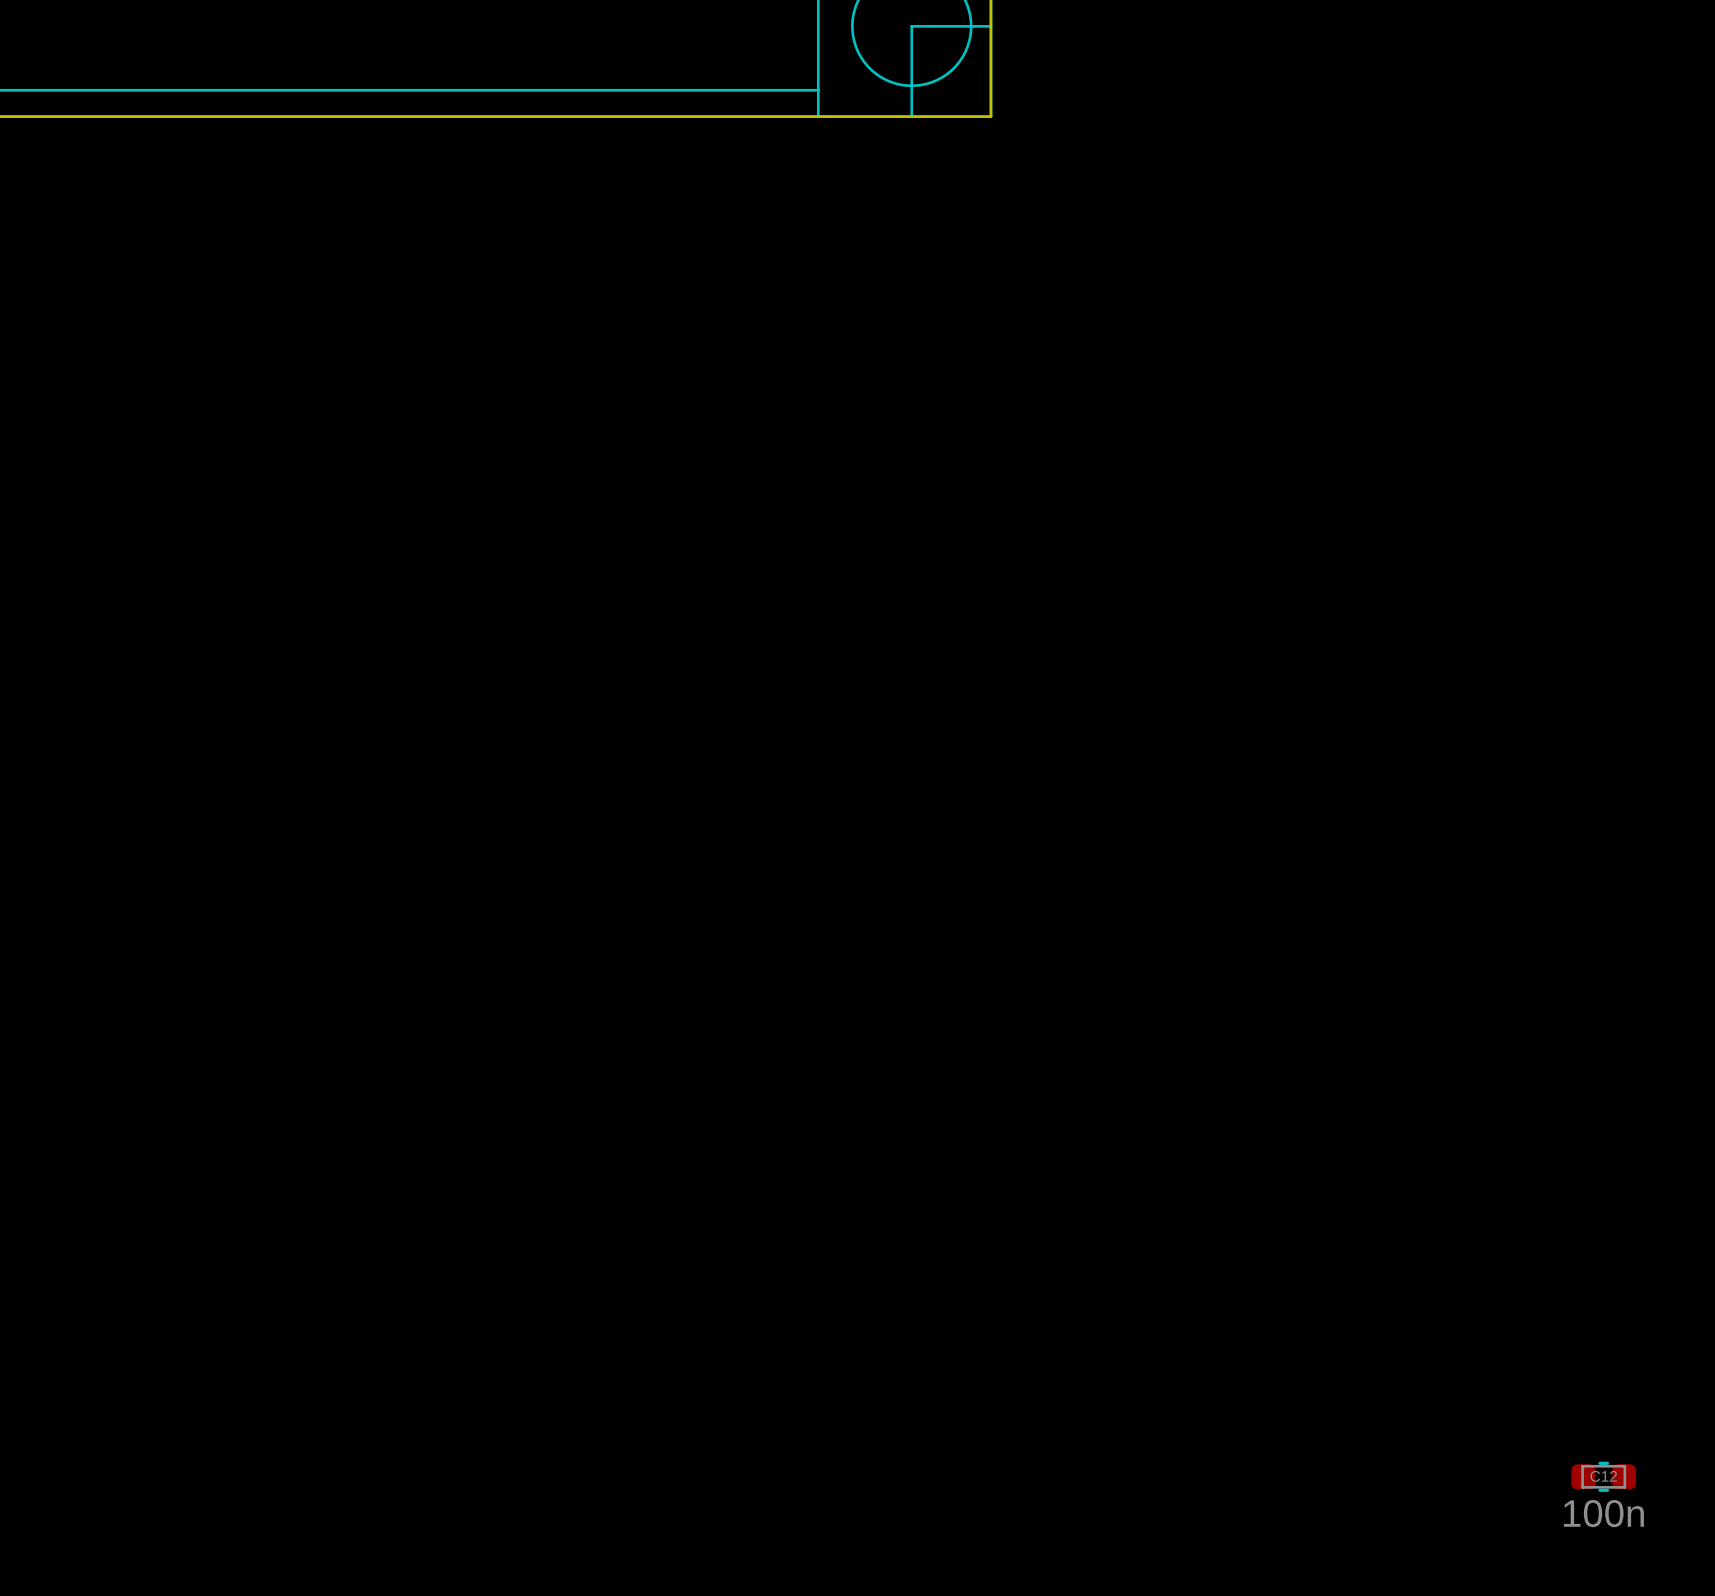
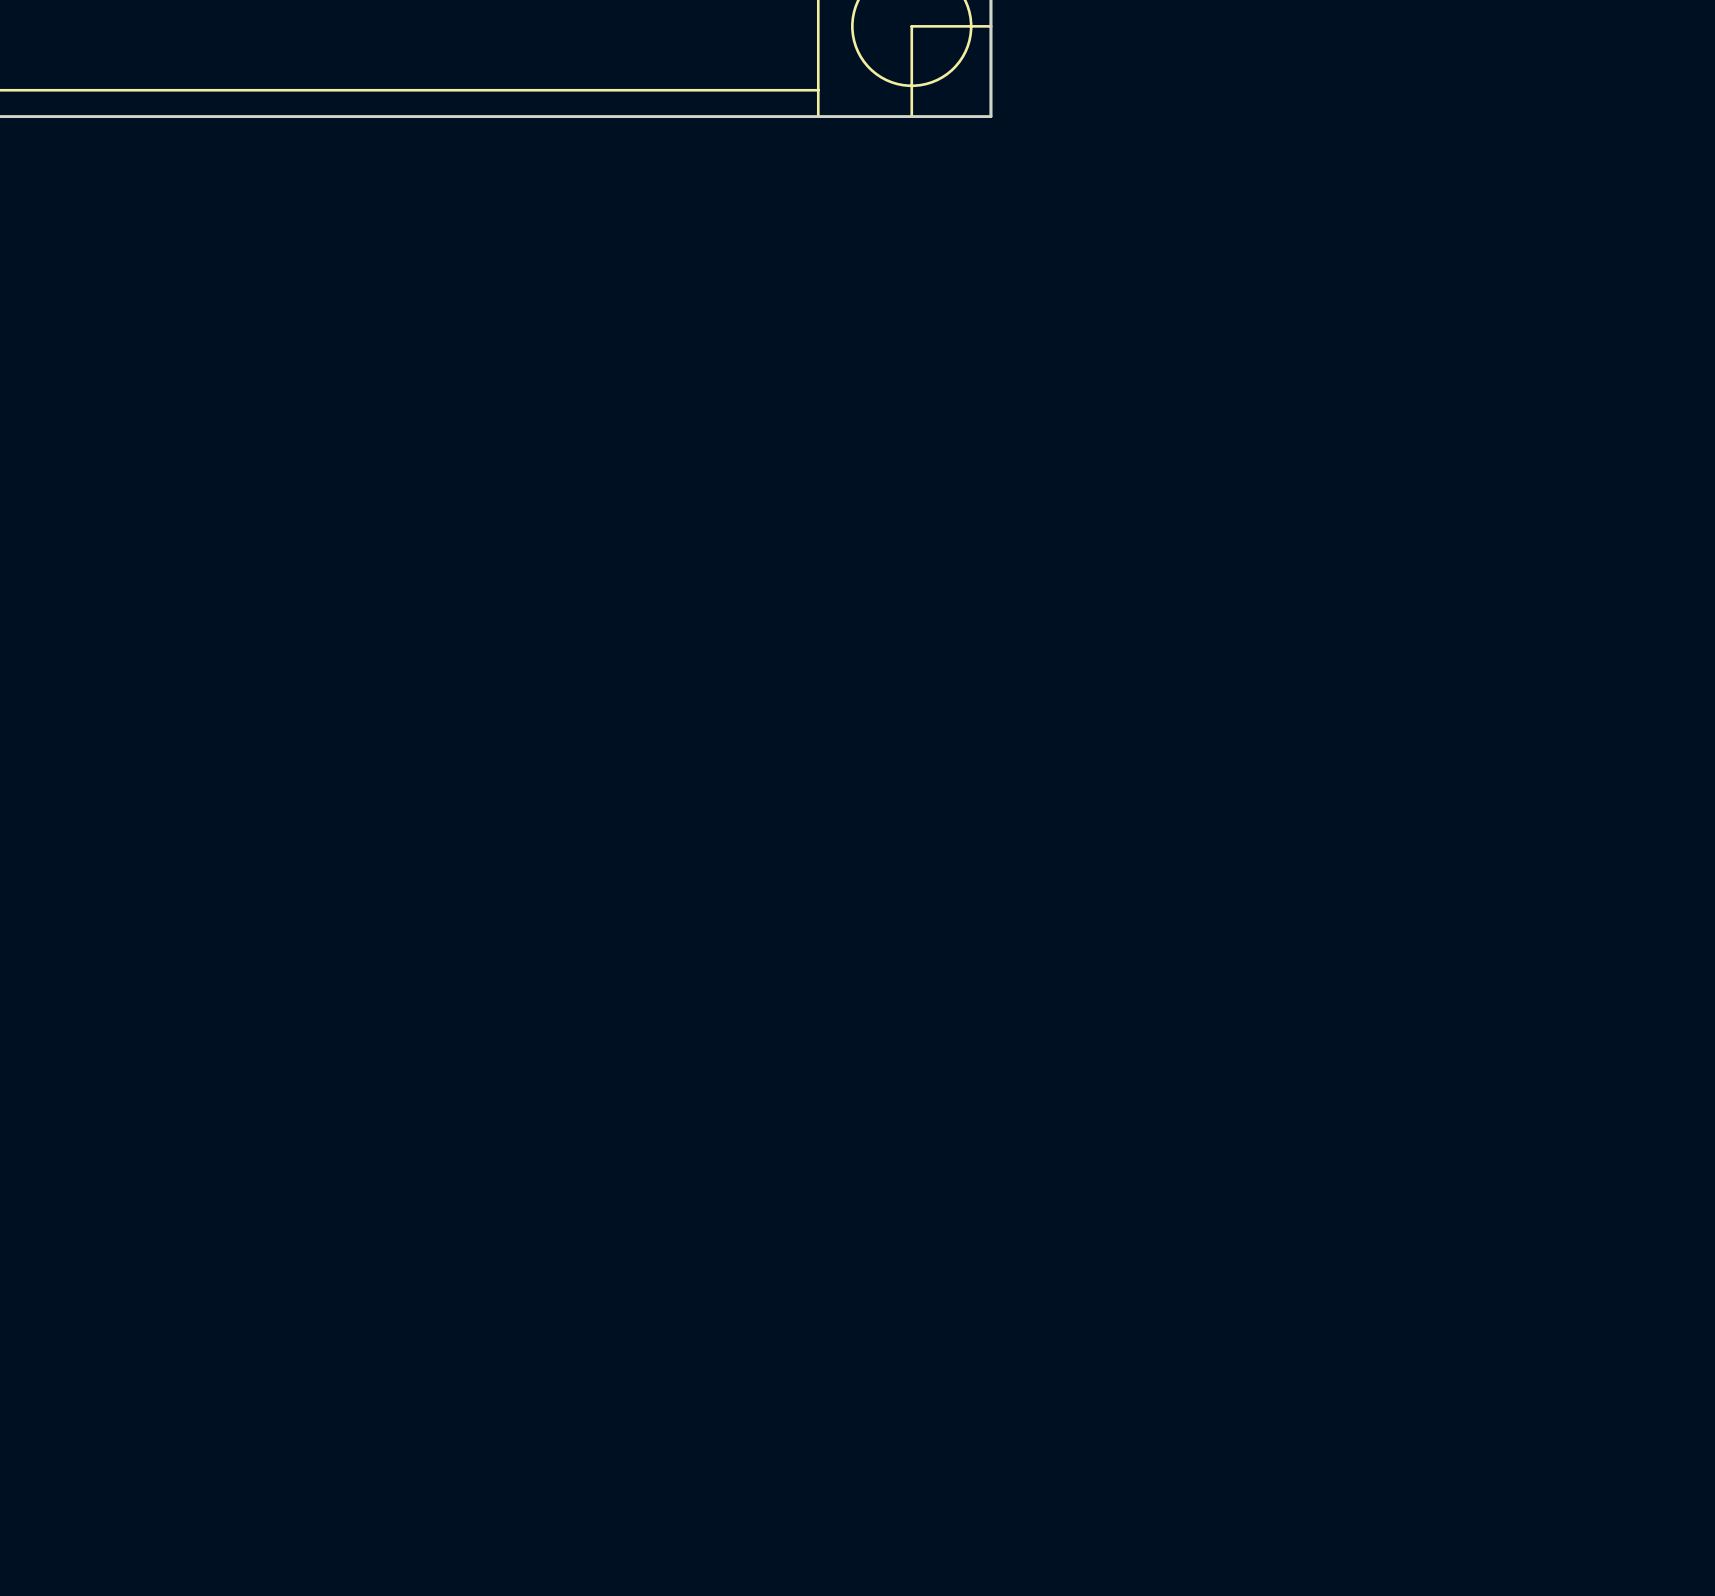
C12: 100n (1603, 1476) -> none

